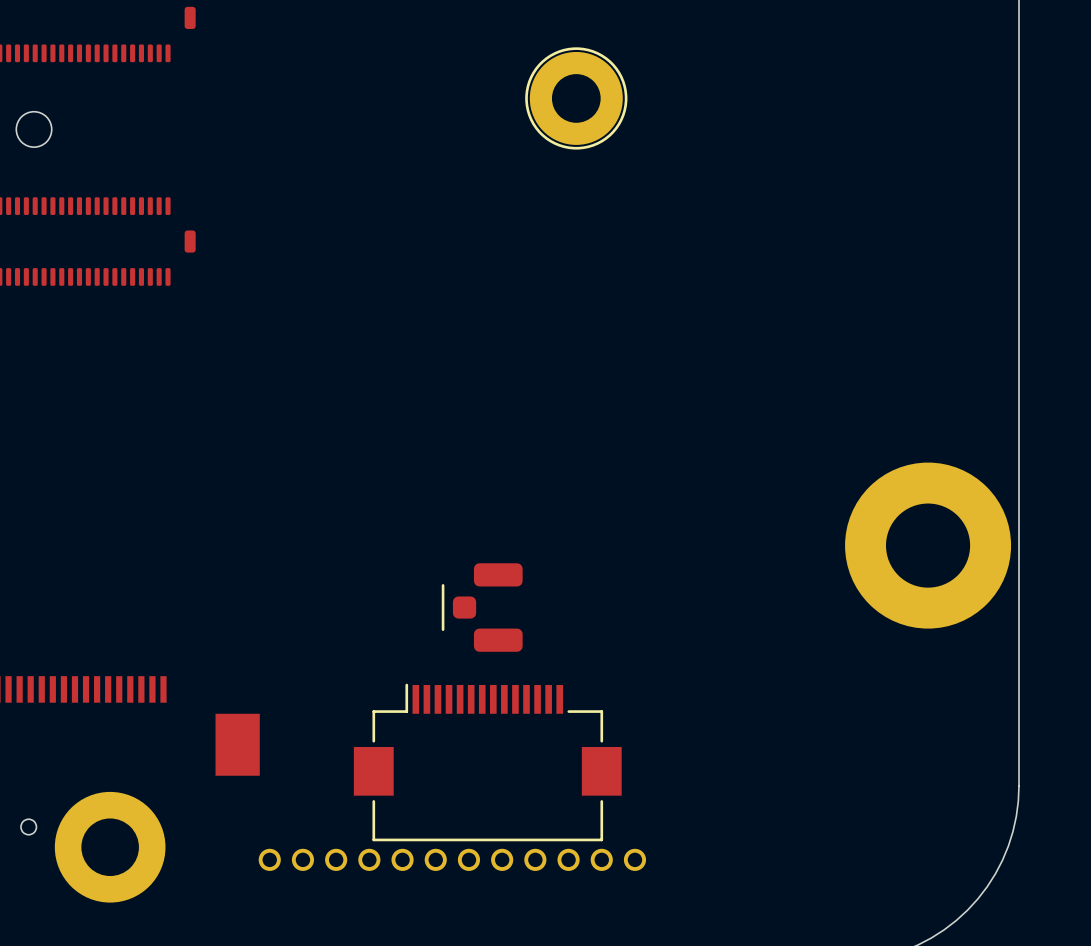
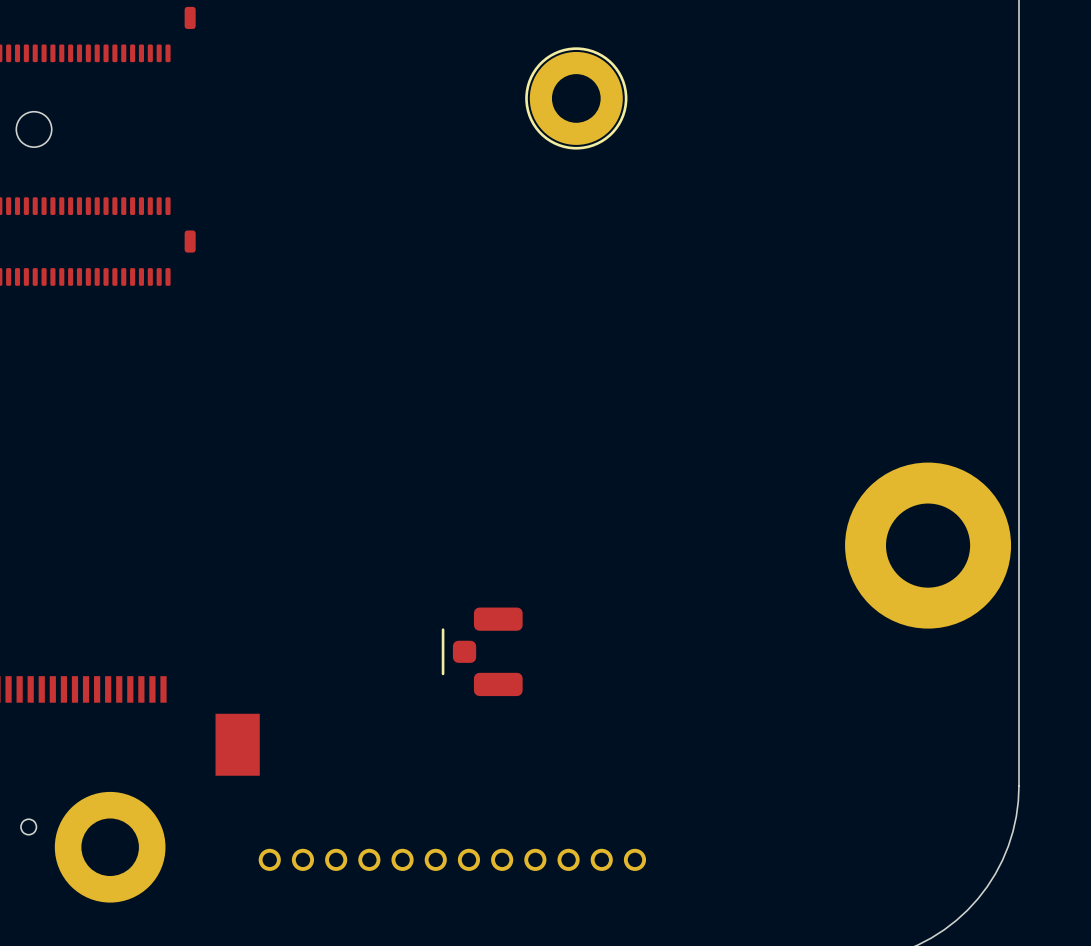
part position: (482, 607) -> (482, 651)
part: (487, 762) -> none

